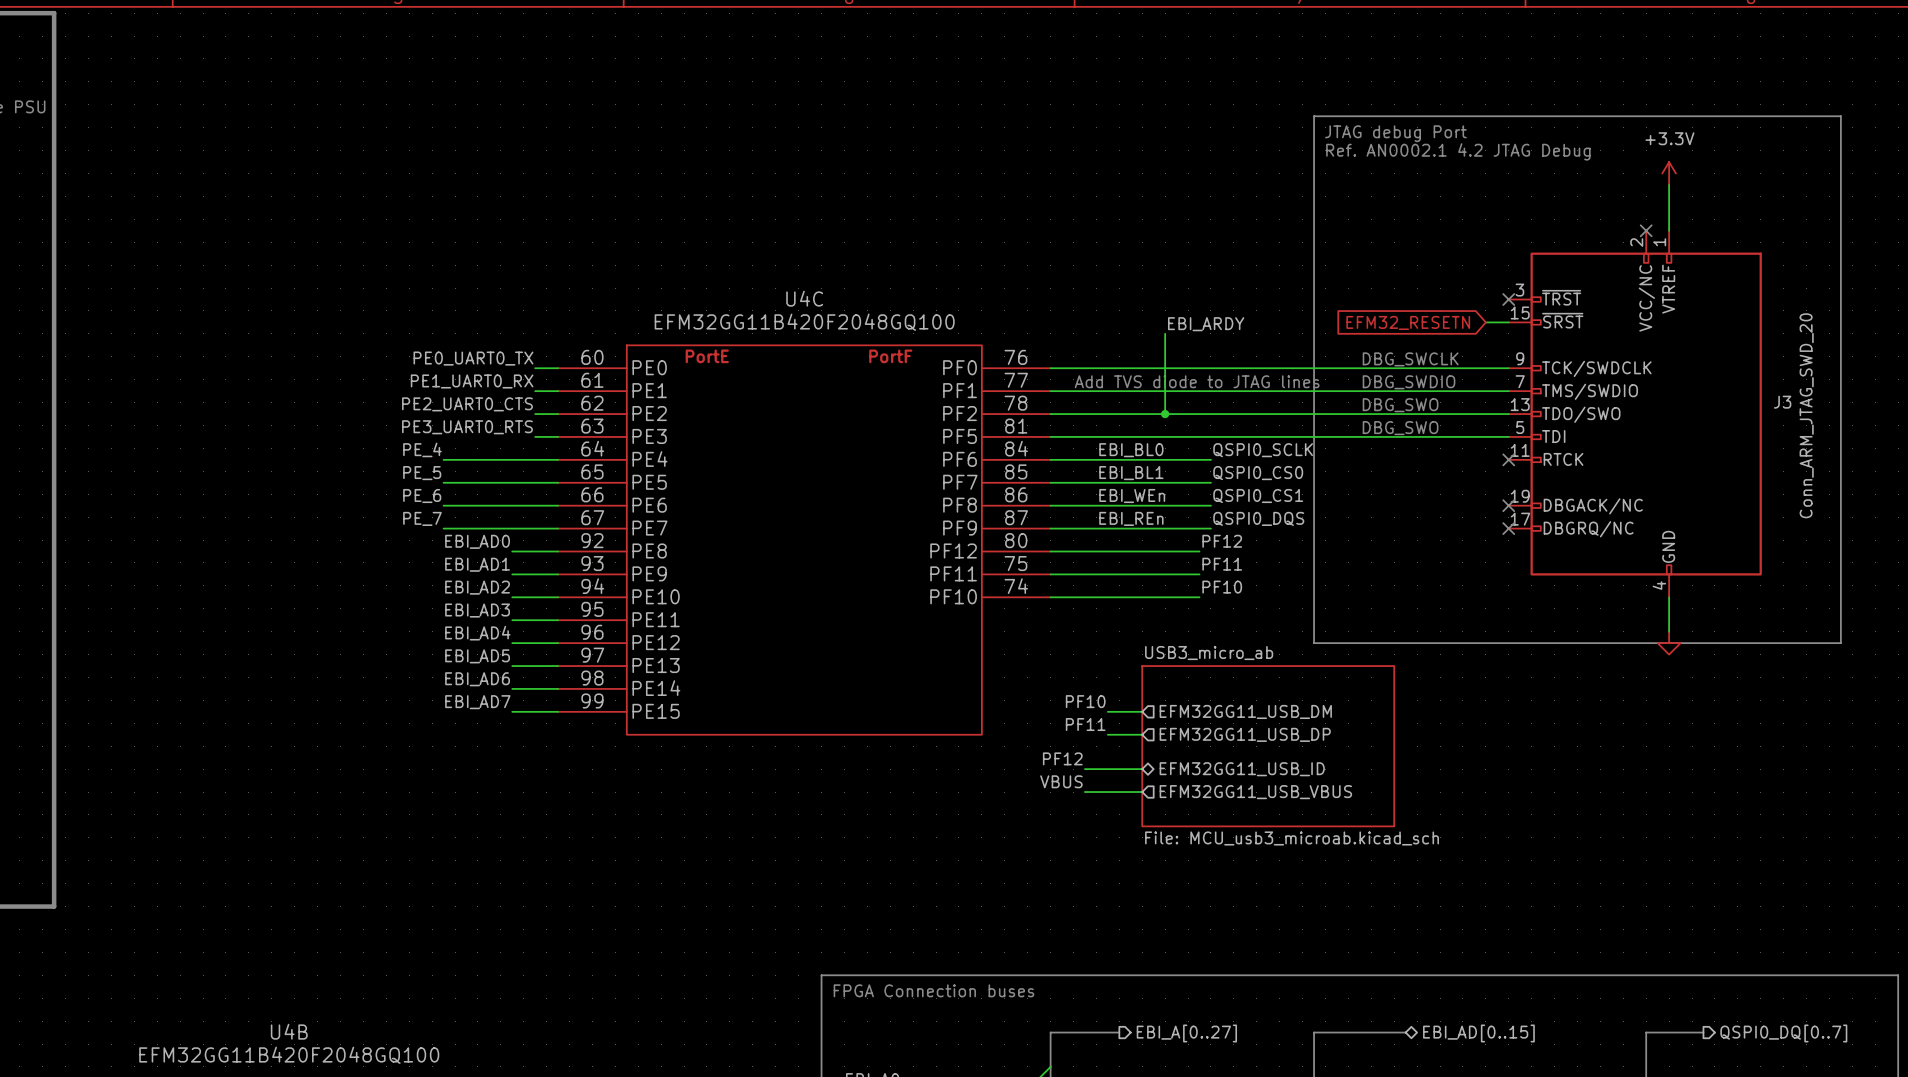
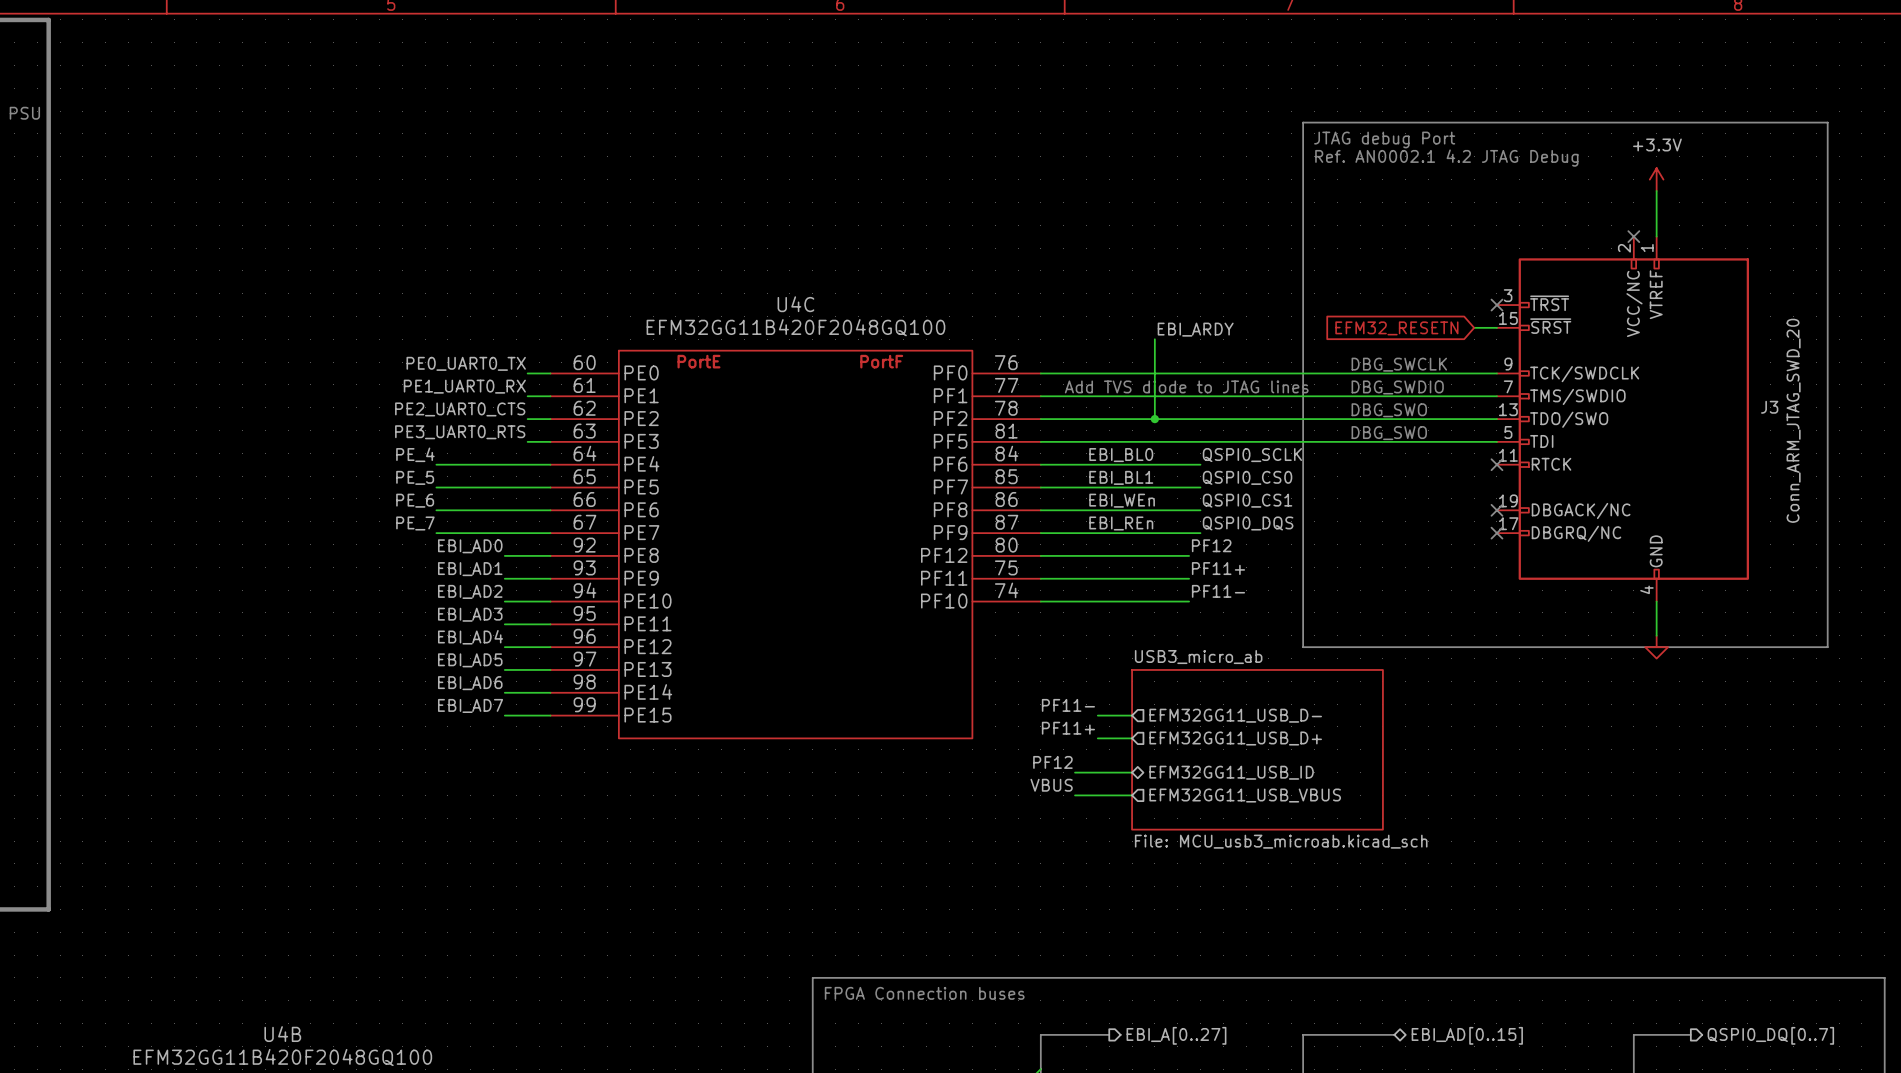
label: PF11 (1222, 564) -> PF11+ (1218, 568)
label: PF10 (1222, 587) -> PF11- (1218, 591)
label: PF10 (1085, 701) -> PF11- (1068, 705)
sheet pin: EFM32GG11_USB_DM (1245, 711) -> EFM32GG11_USB_D- (1235, 715)
label: PF11 (1085, 724) -> PF11+ (1068, 728)
sheet pin: EFM32GG11_USB_DP (1245, 734) -> EFM32GG11_USB_D+ (1235, 738)

